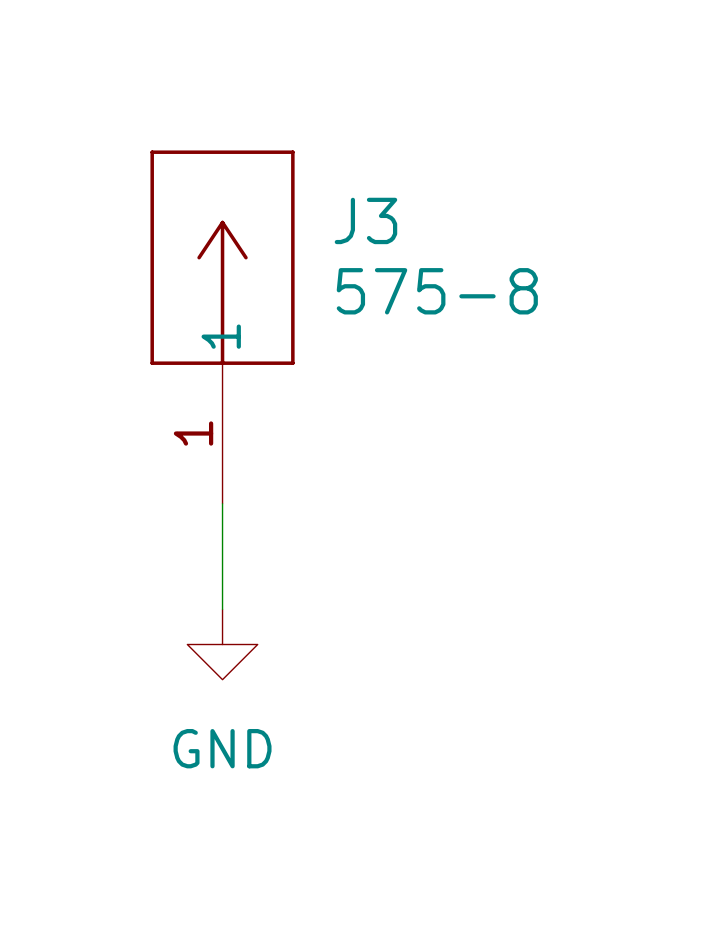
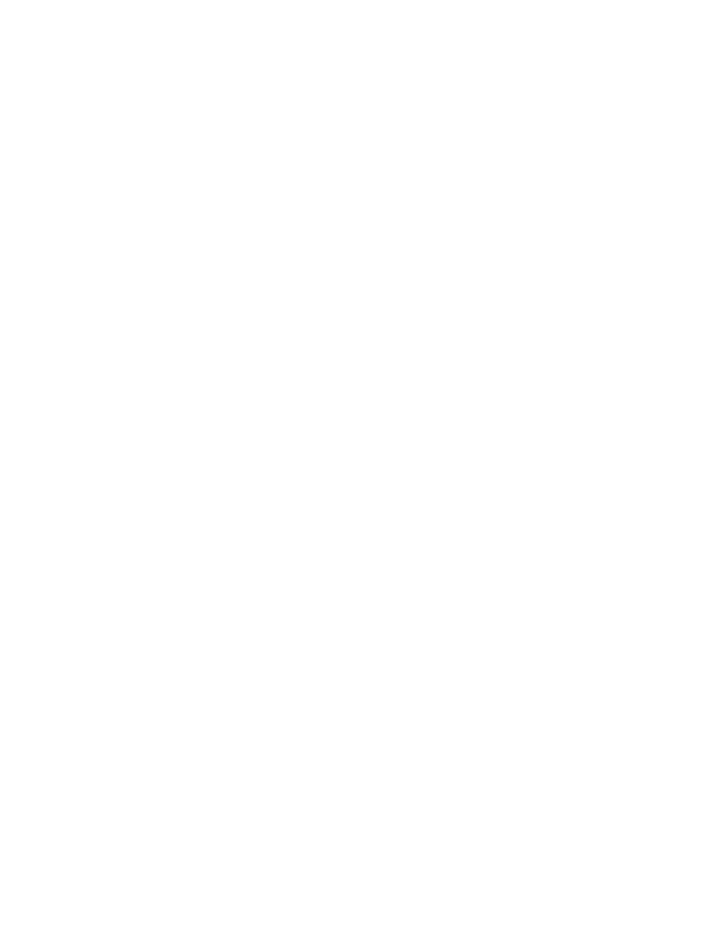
J3: 575-8 (222, 327) -> none
wire: (222, 503) (222, 609) -> none
power symbol: GND (222, 644) -> none

